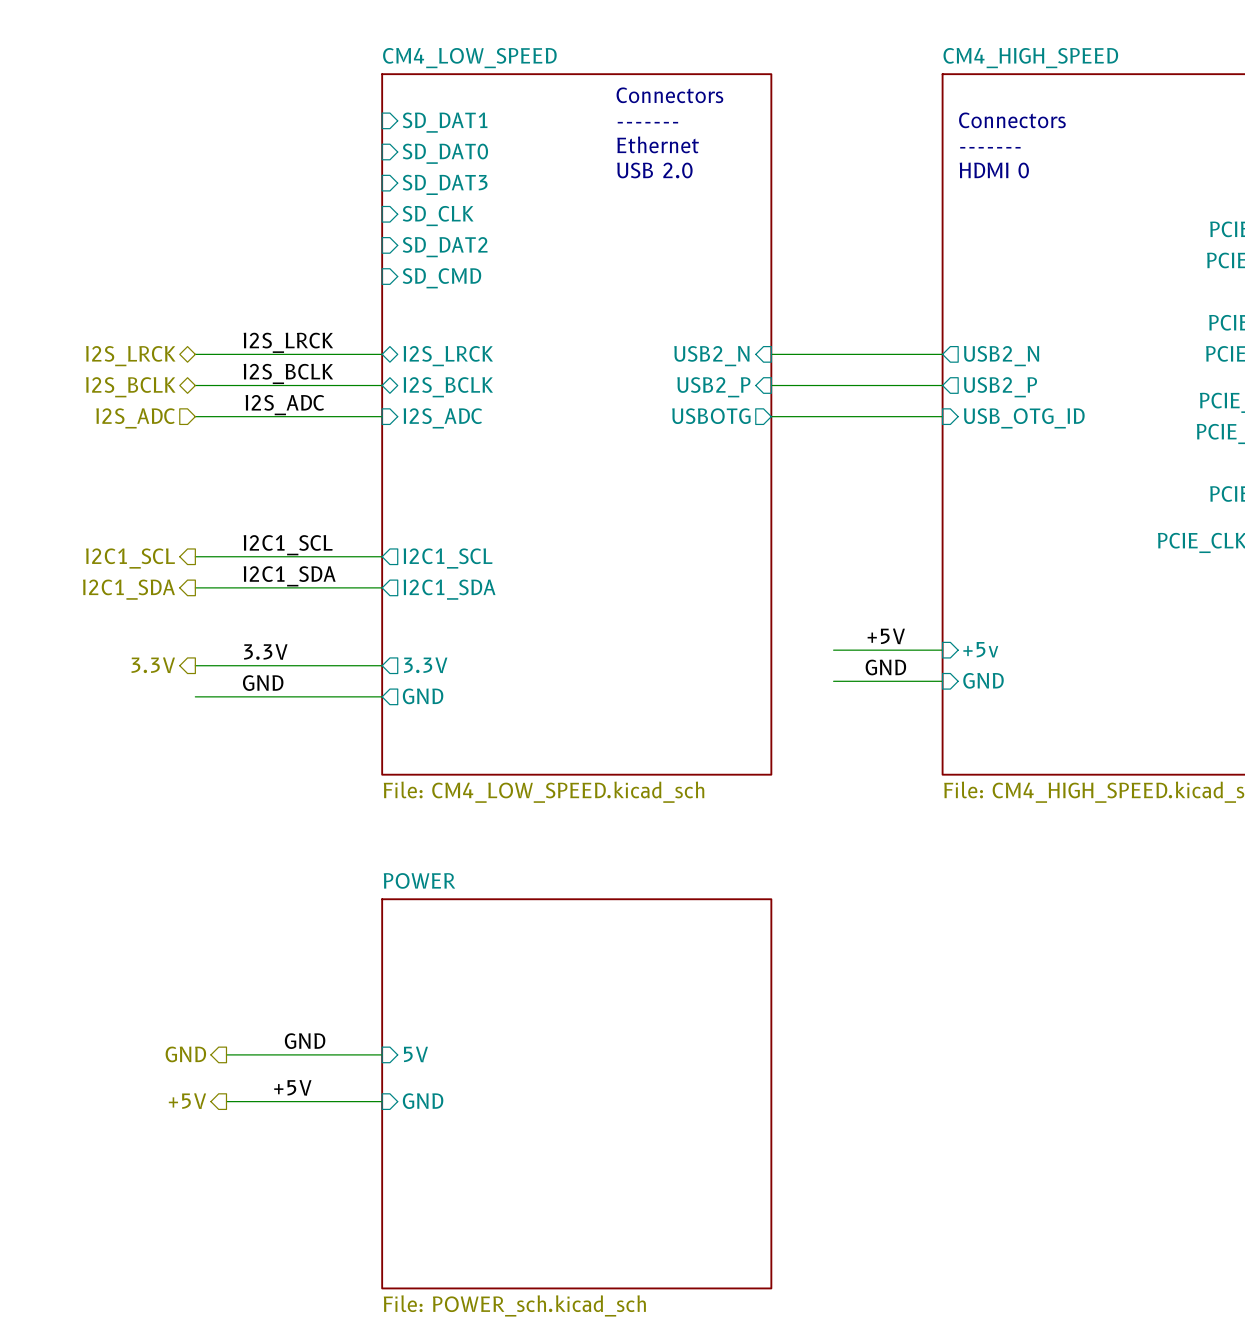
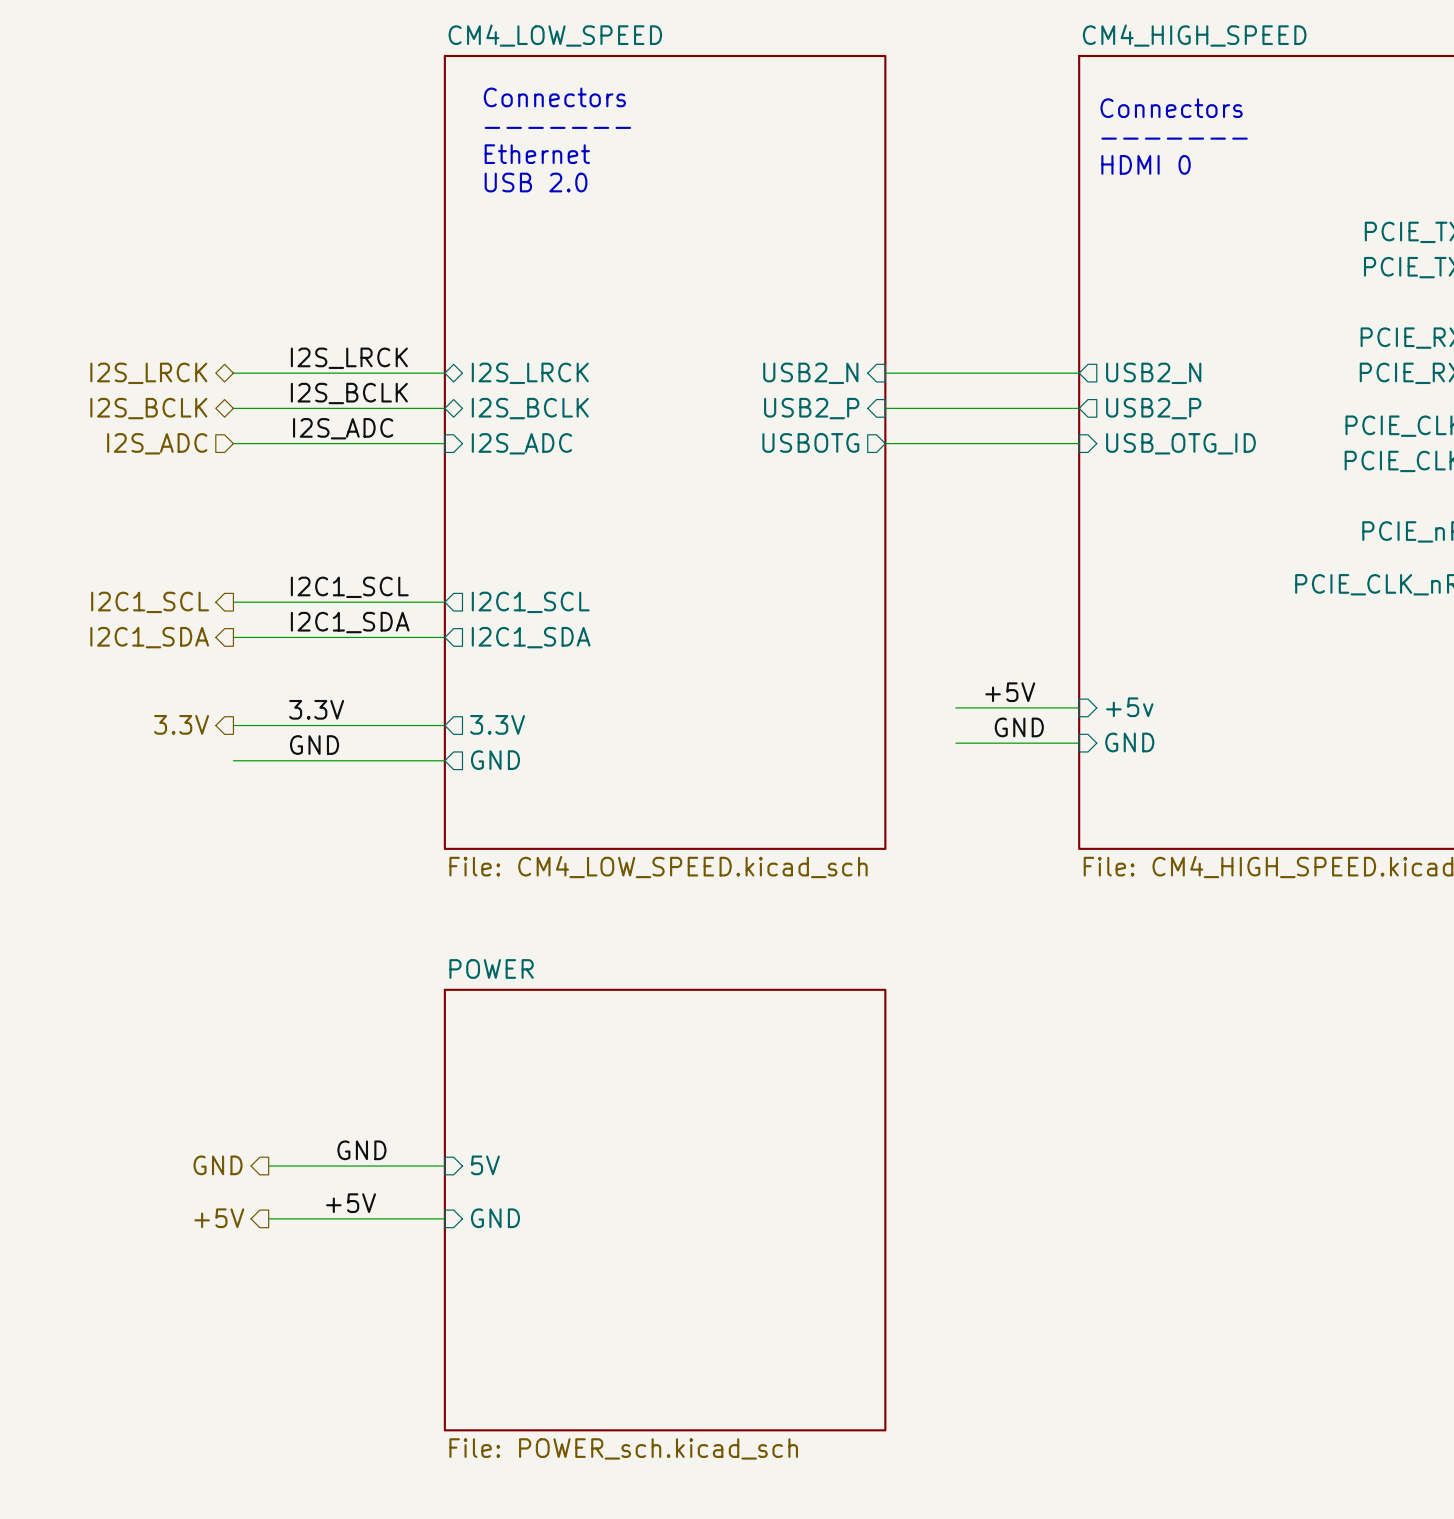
text position: Connectors (669, 95) -> Connectors (554, 97)
sheet pin: SD_DAT1 (445, 122) -> none
text position: ------- (647, 122) -> ------- (557, 127)
text position: Ethernet (658, 144) -> Ethernet (537, 154)
sheet pin: SD_DAT0 (445, 153) -> none
text position: USB 2.0 (654, 170) -> USB 2.0 (536, 182)
sheet pin: SD_DAT3 (445, 184) -> none
sheet pin: SD_CLK (438, 216) -> none
sheet pin: SD_DAT2 (445, 247) -> none
sheet pin: SD_CMD (441, 278) -> none

